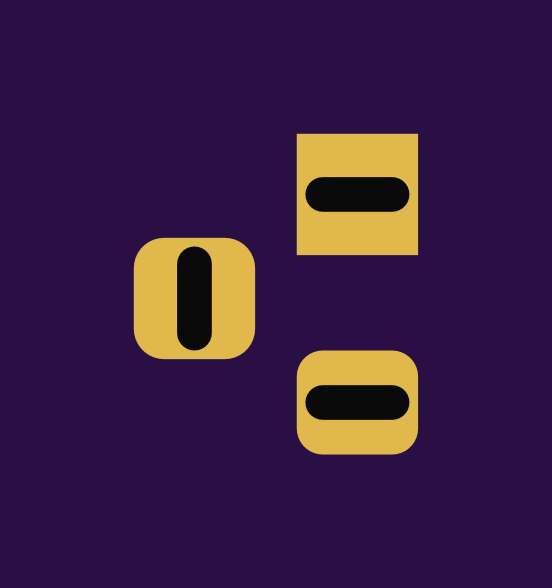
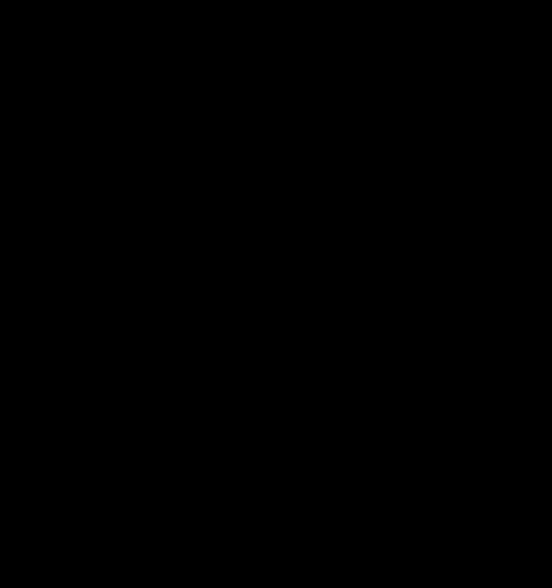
part: (275, 294) -> none

